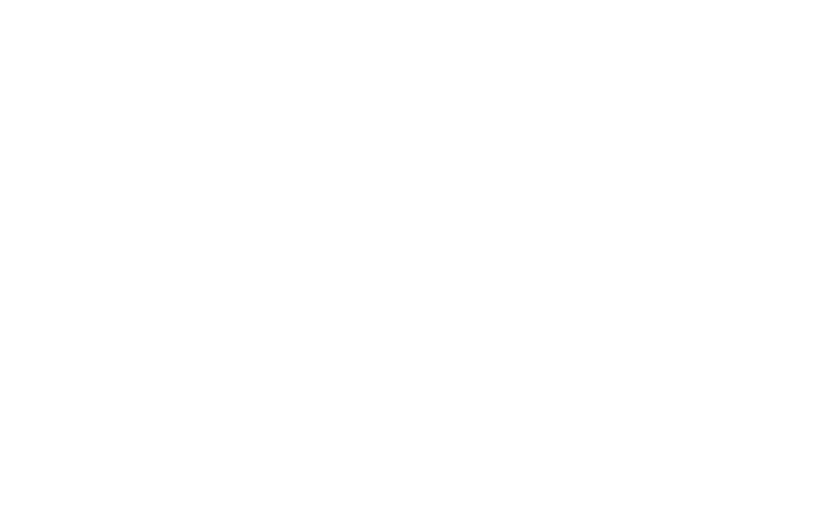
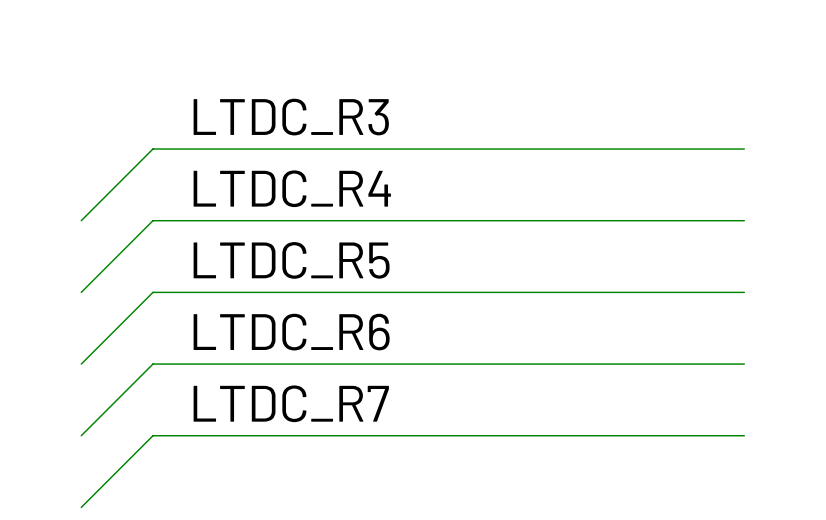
label: none -> LTDC_R3 (291, 117)
wire: none -> (744, 149) (152, 149) (81, 220)
label: none -> LTDC_R4 (292, 188)
wire: none -> (744, 220) (152, 220) (81, 292)
label: none -> LTDC_R5 (291, 260)
wire: none -> (744, 292) (152, 292) (81, 364)
label: none -> LTDC_R6 (291, 332)
wire: none -> (744, 364) (152, 364) (81, 435)
label: none -> LTDC_R7 (291, 403)
wire: none -> (744, 435) (152, 435) (81, 507)

